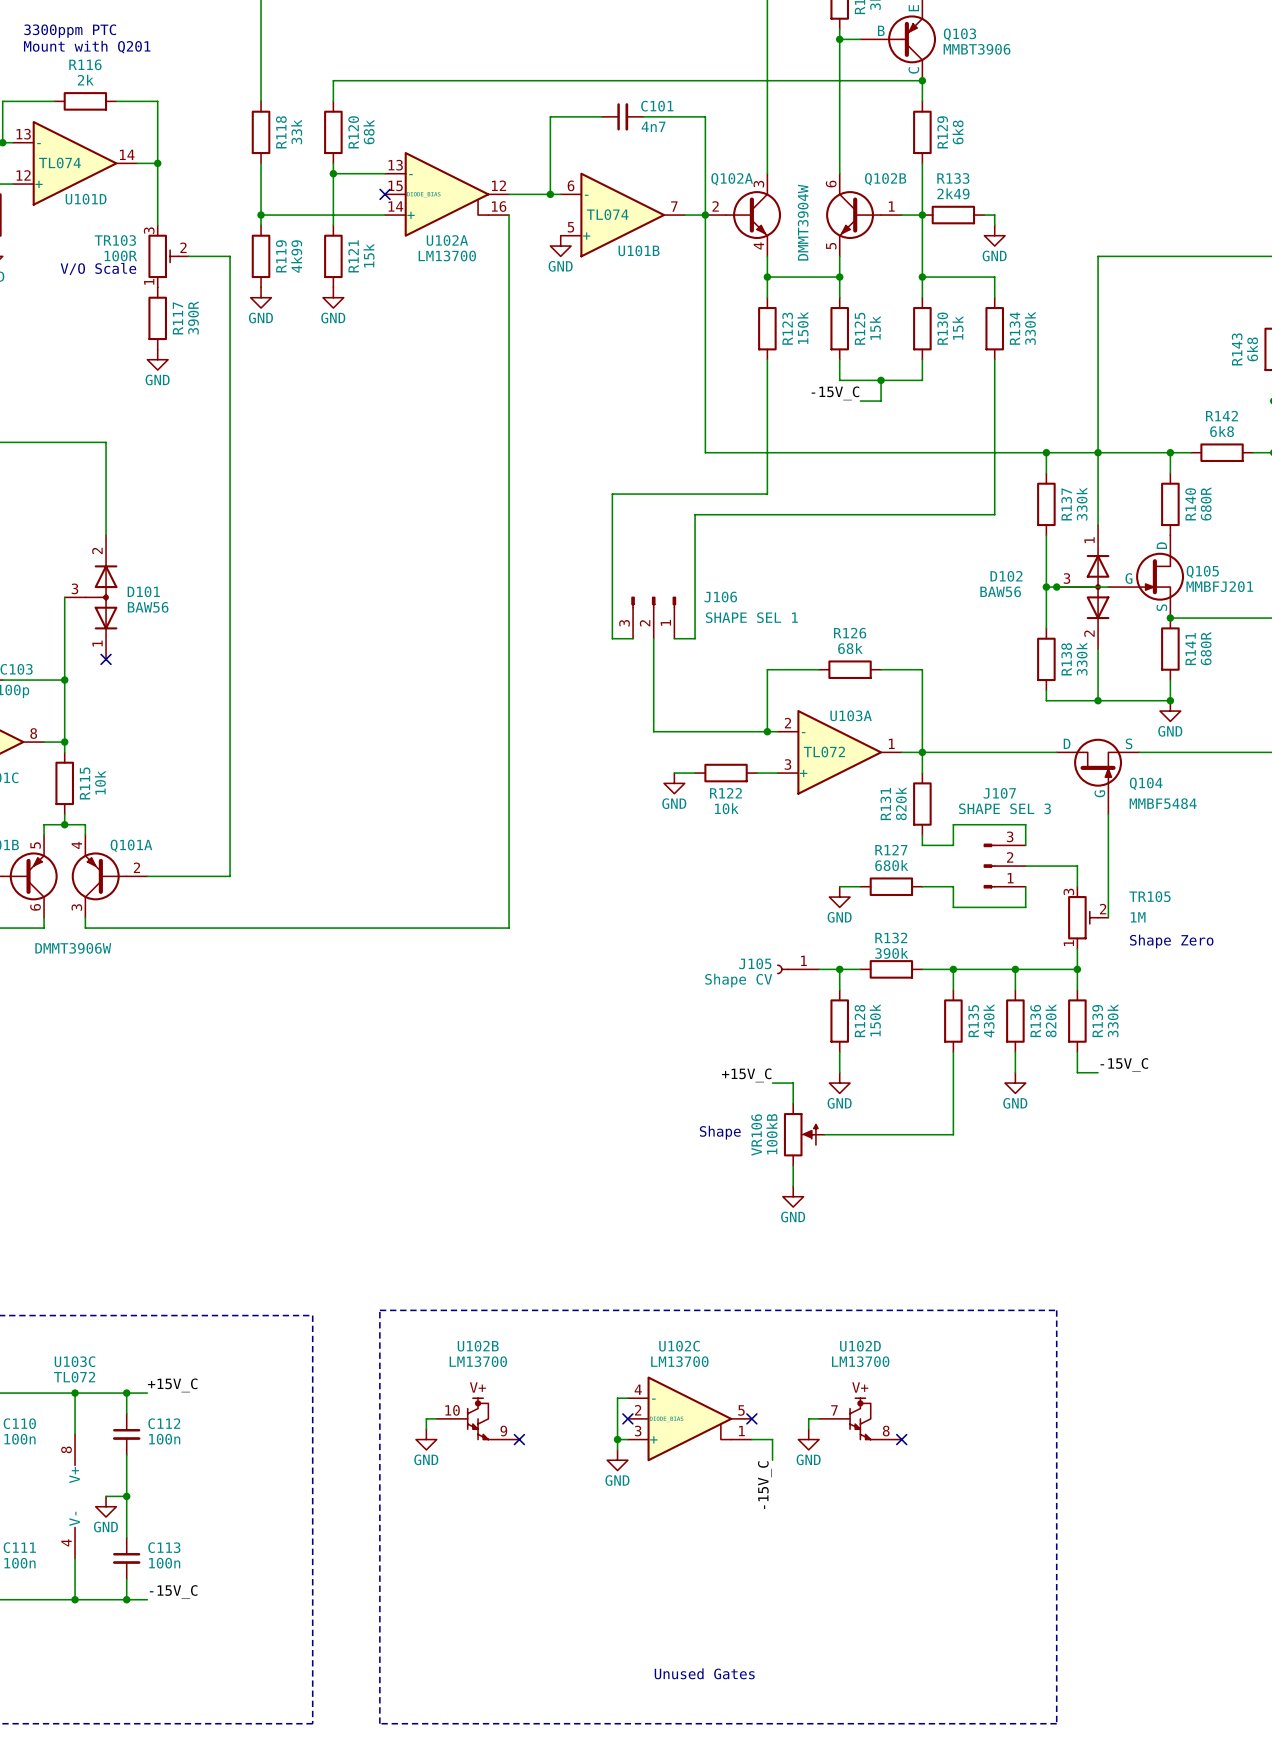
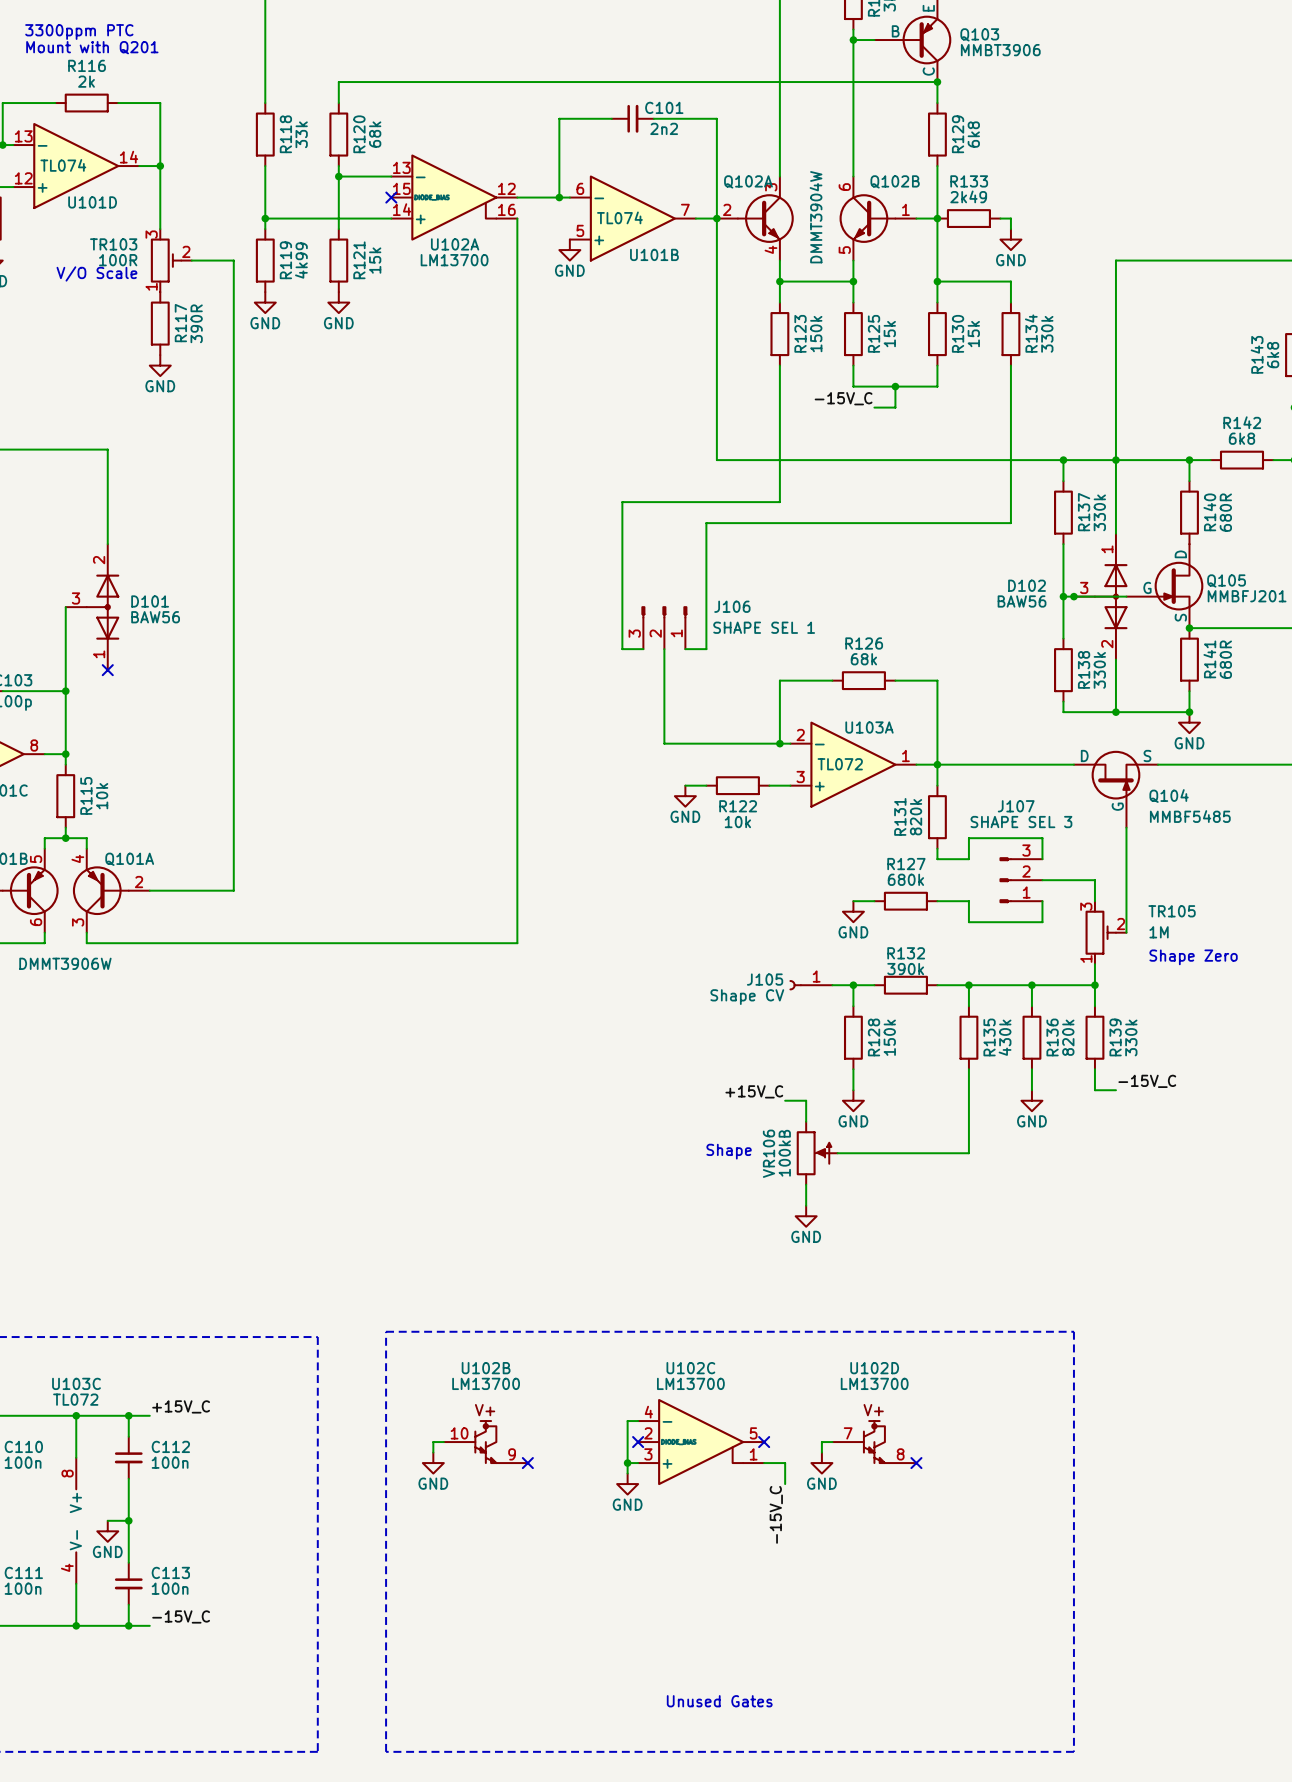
C101 value: 4n7 (653, 126) -> 2n2 (664, 128)
Q104 value: MMBF5484 (1163, 803) -> MMBF5485 (1190, 816)

